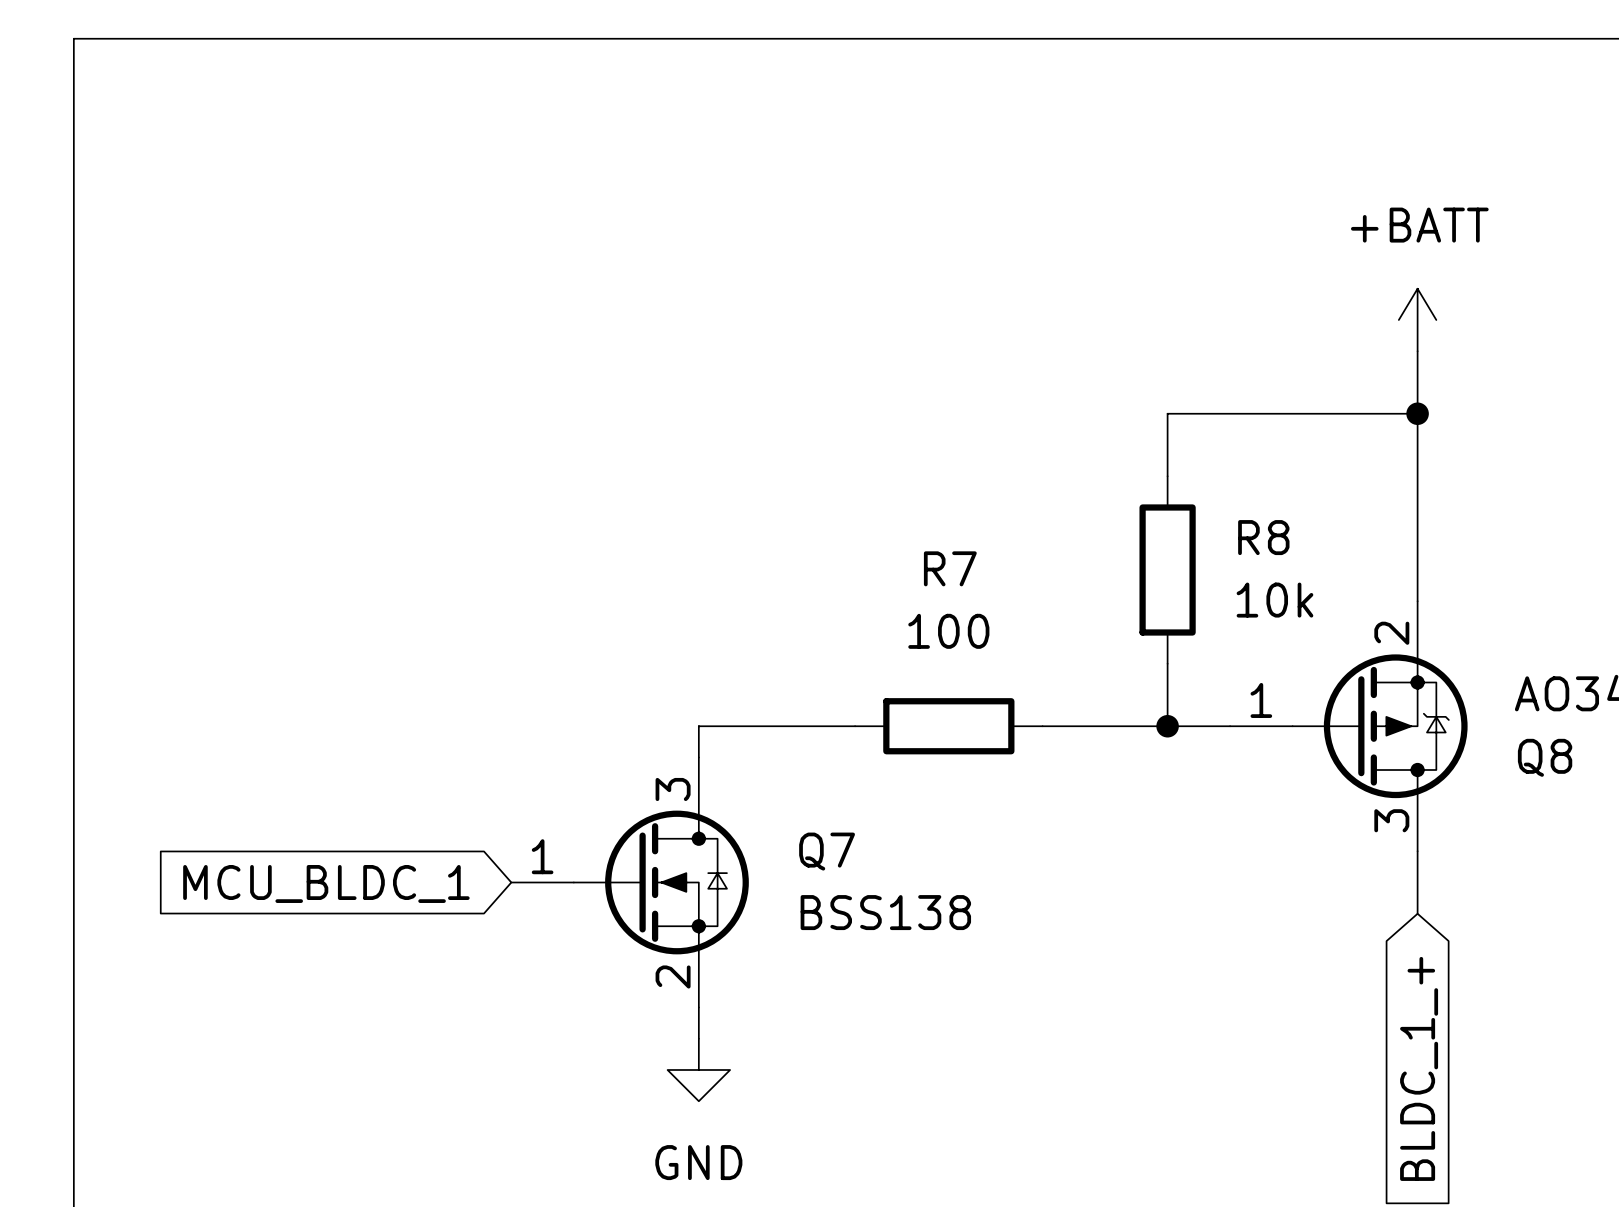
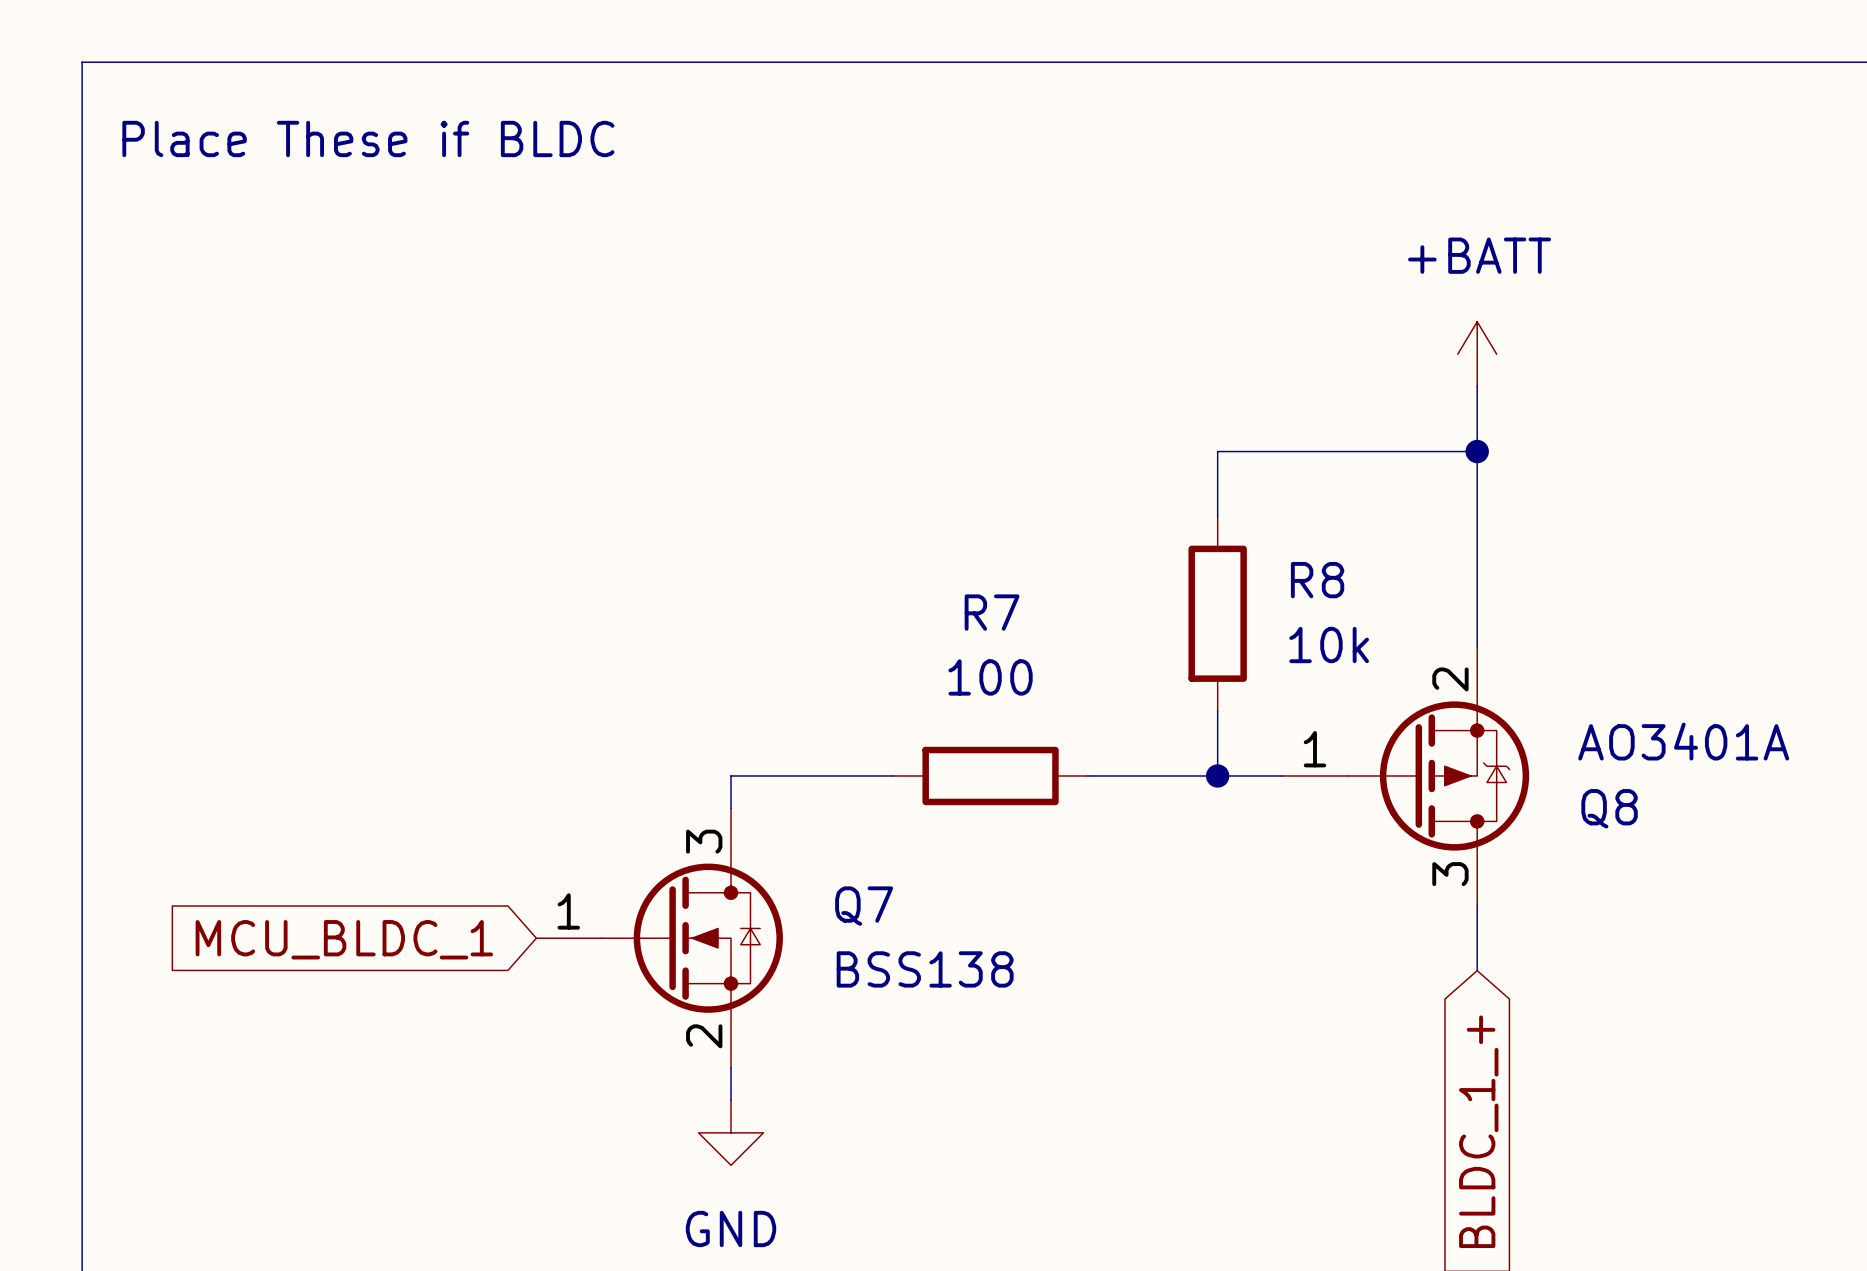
text: none -> Place These if BLDC (368, 138)

